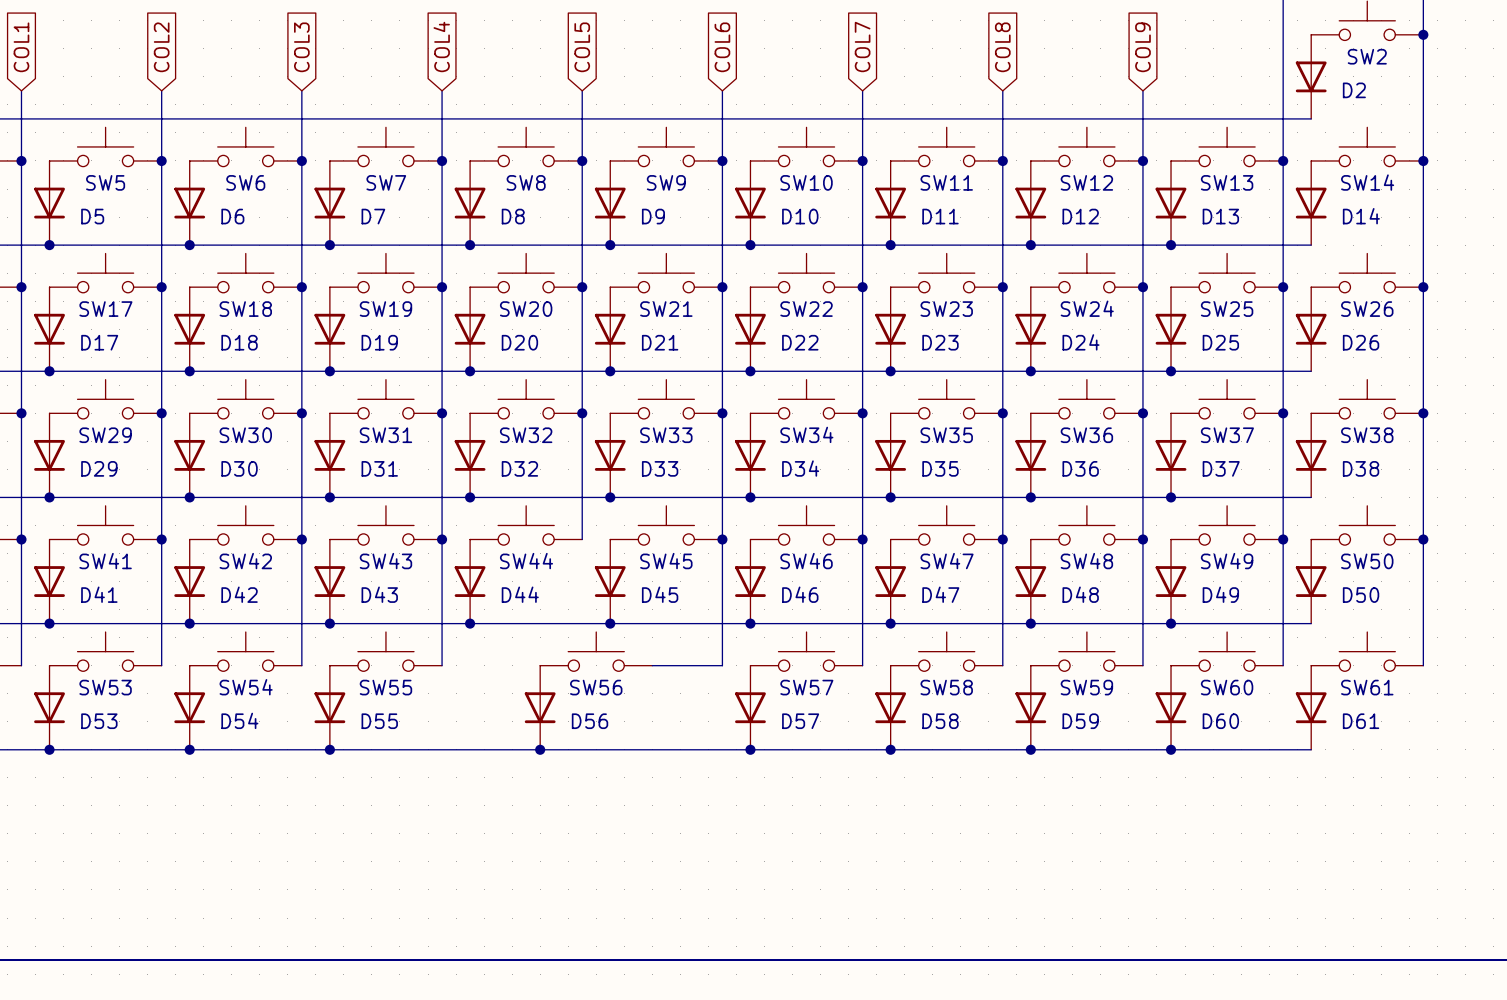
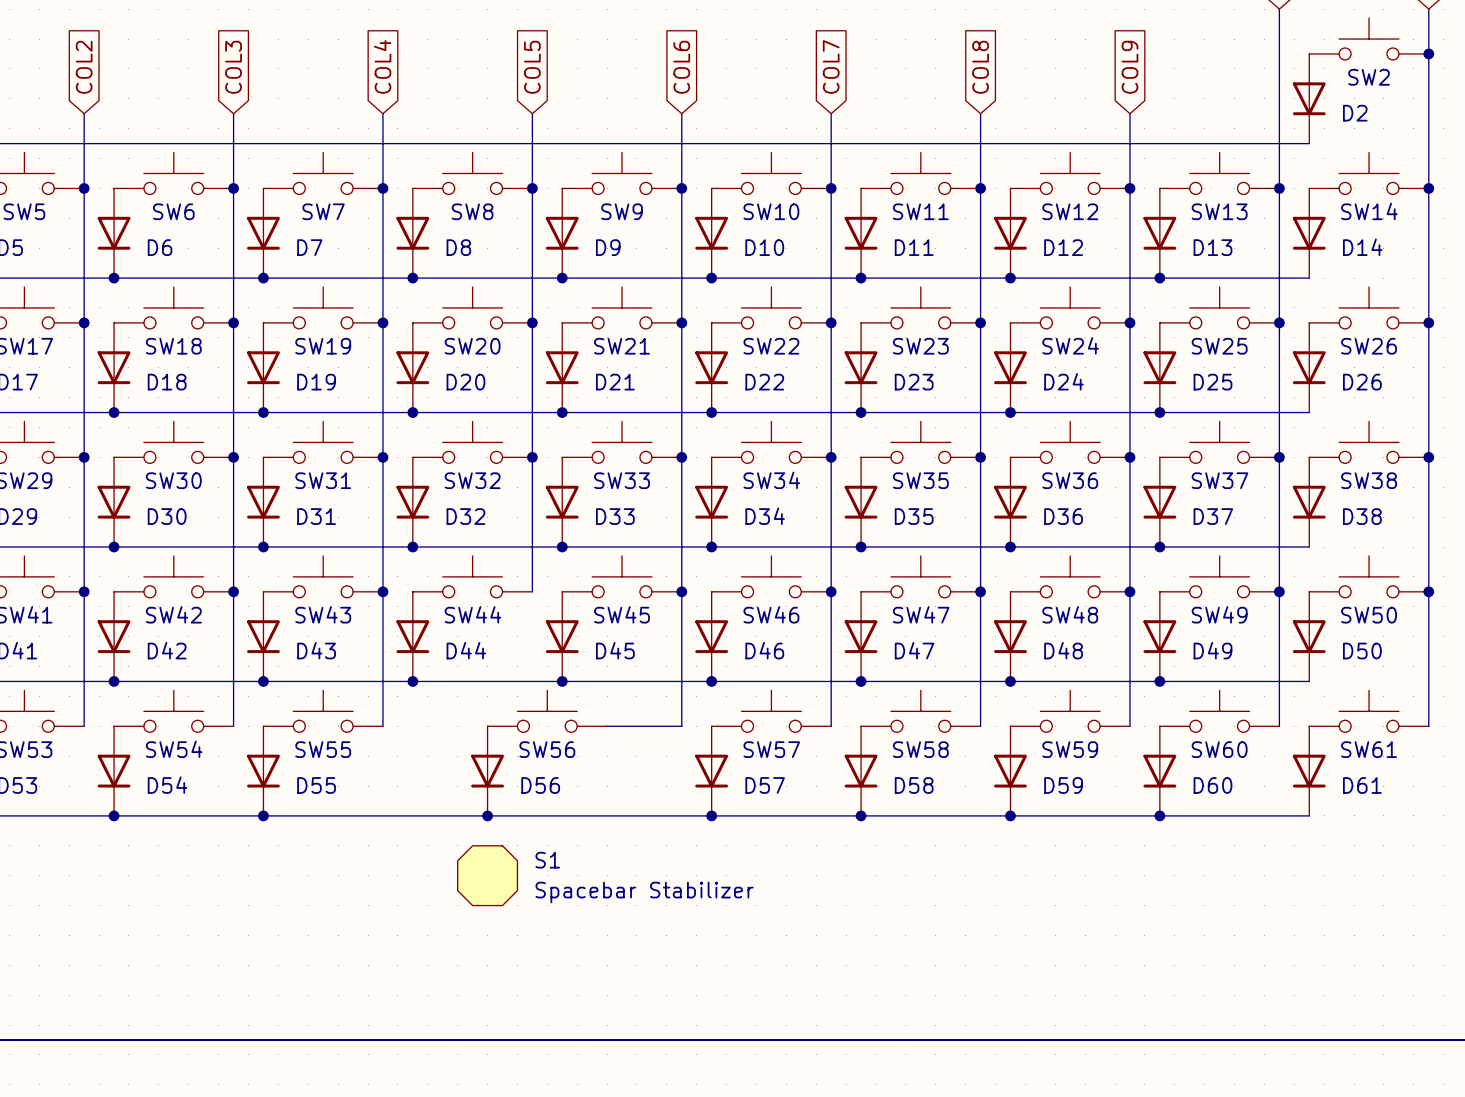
S1: none -> Spacebar Stabilizer (487, 875)

